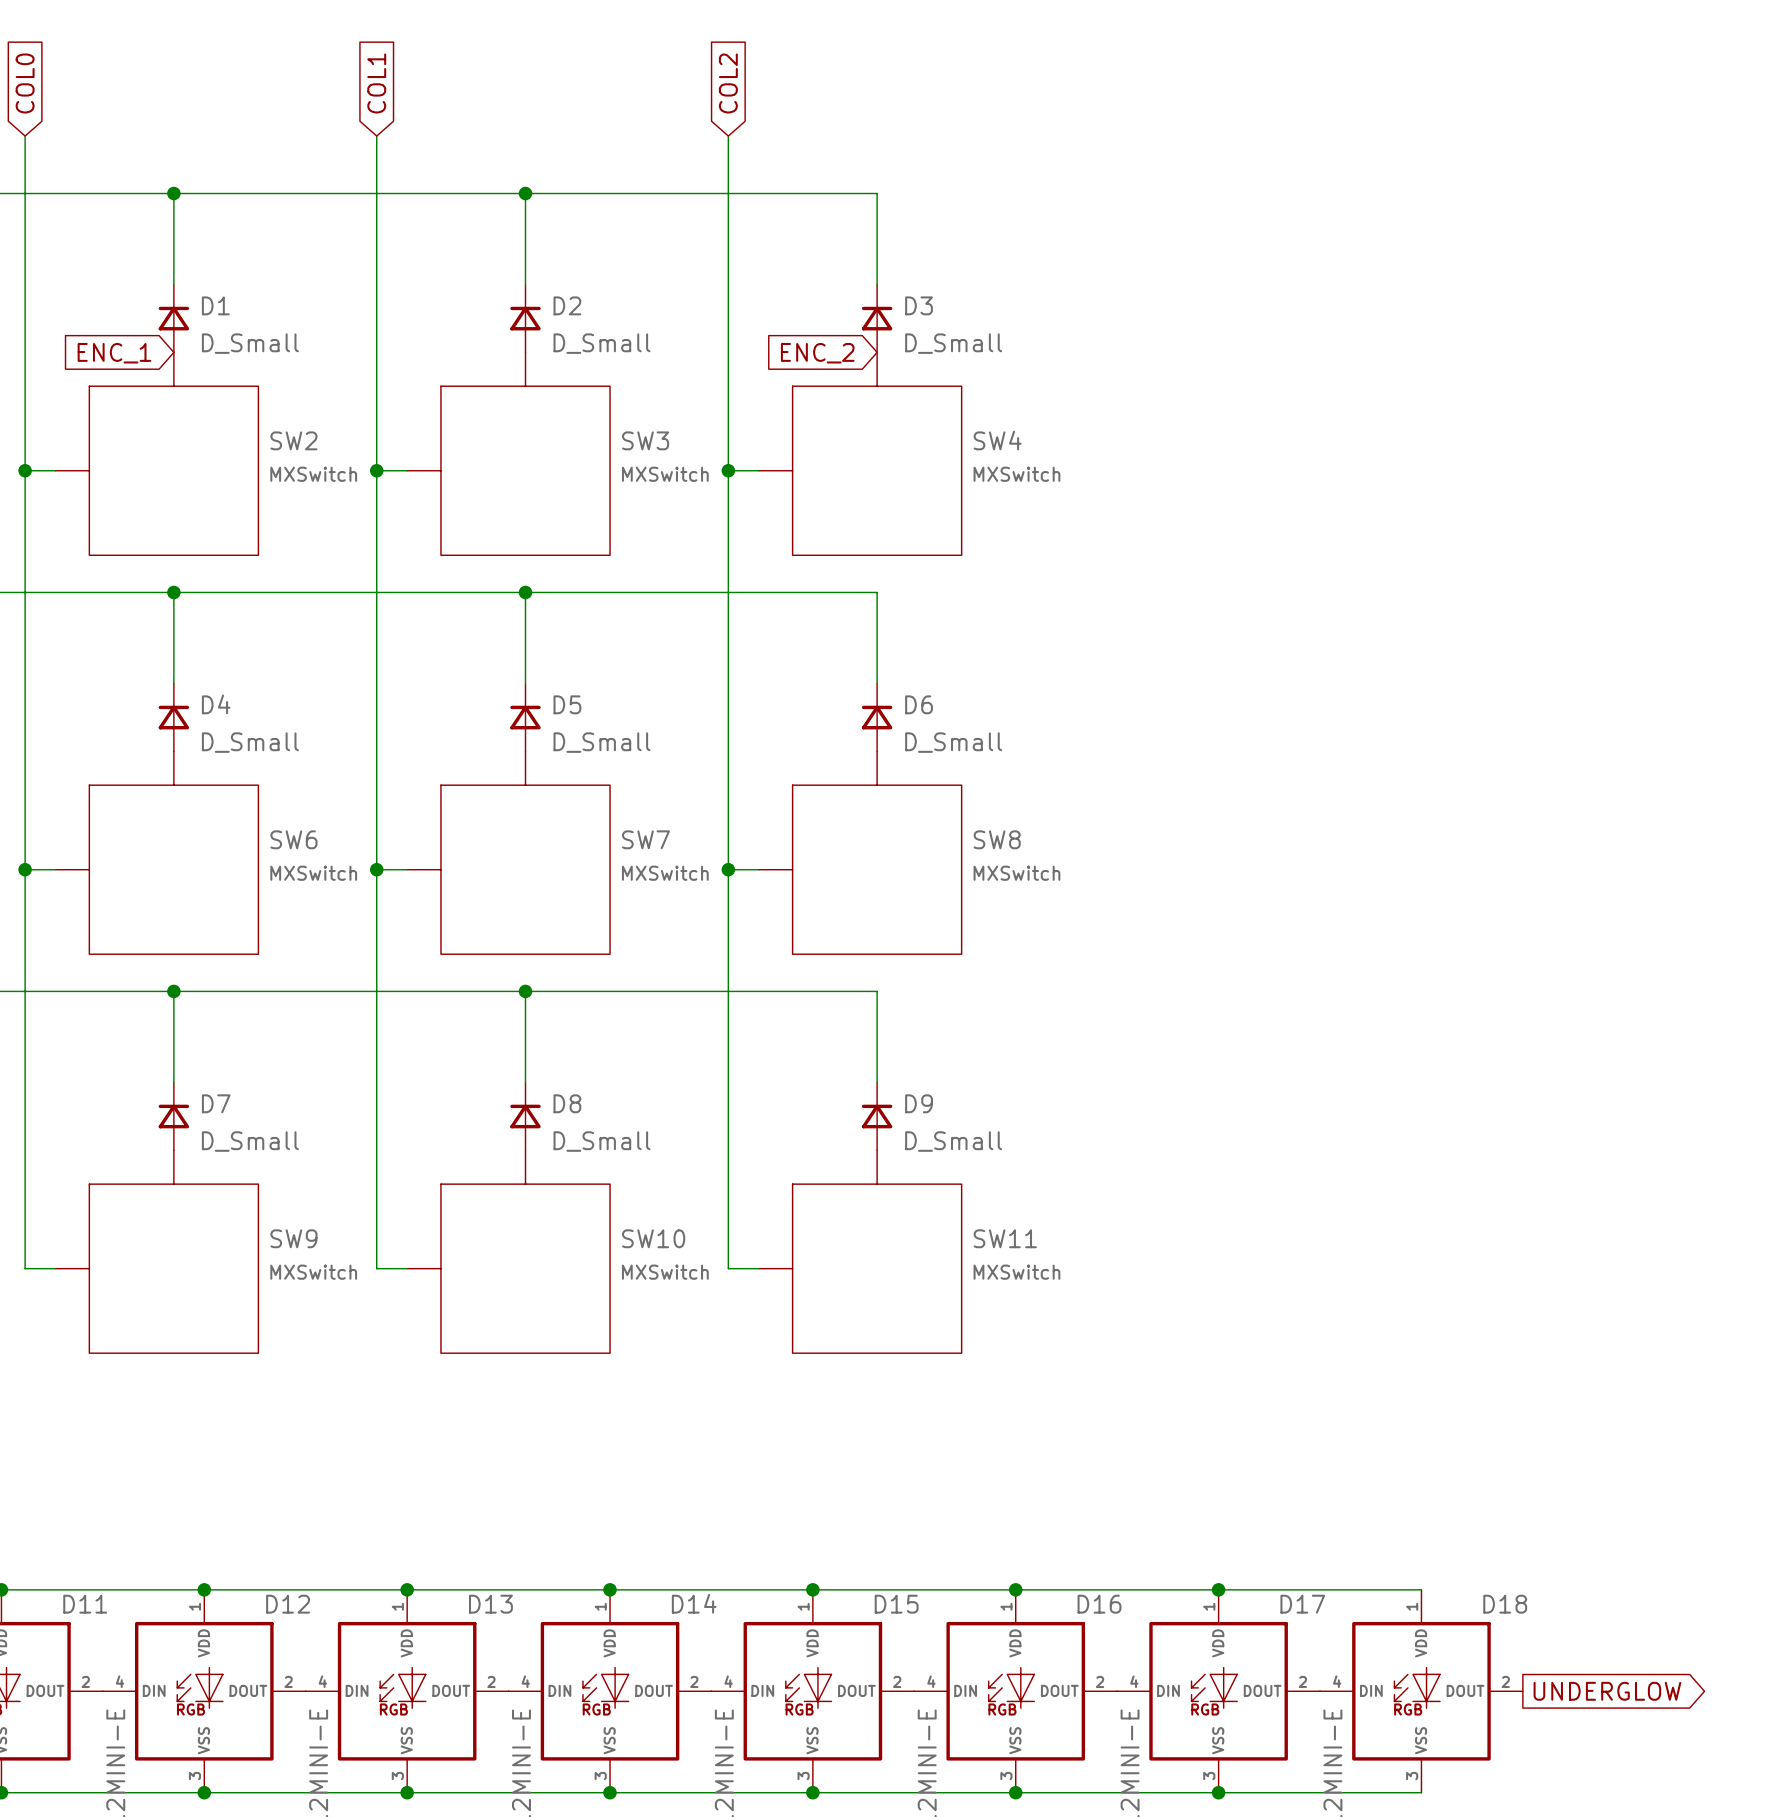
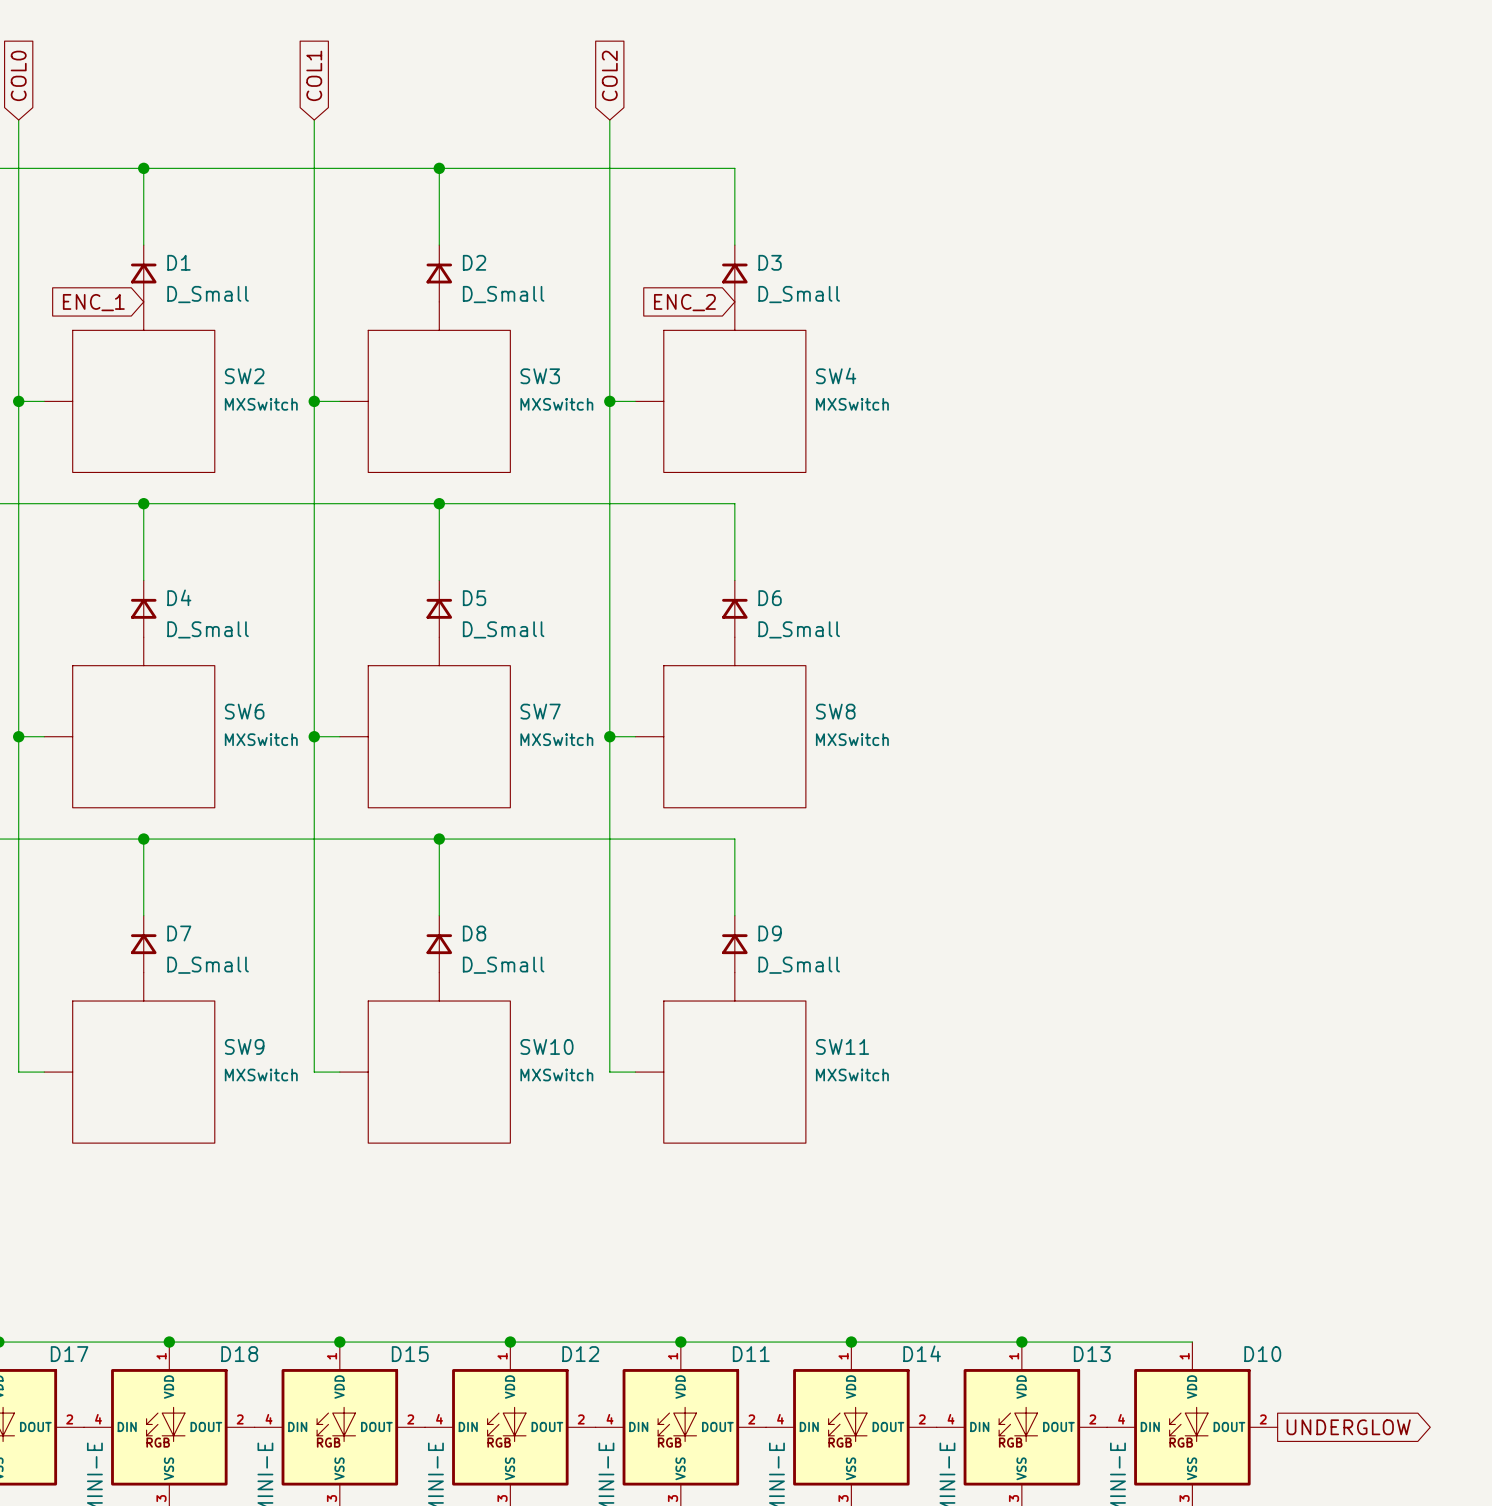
D14 name: D14 (694, 1603) -> D12 (580, 1354)
D11 name: D11 (85, 1604) -> D17 (69, 1354)
D12 name: D12 (288, 1604) -> D18 (239, 1354)
D13 name: D13 (490, 1604) -> D15 (410, 1354)
D15 name: D15 (896, 1604) -> D11 (751, 1354)
D16 name: D16 (1099, 1604) -> D14 (922, 1353)
D17 name: D17 (1302, 1604) -> D13 (1092, 1354)
D18 name: D18 (1505, 1604) -> D10 (1262, 1354)

